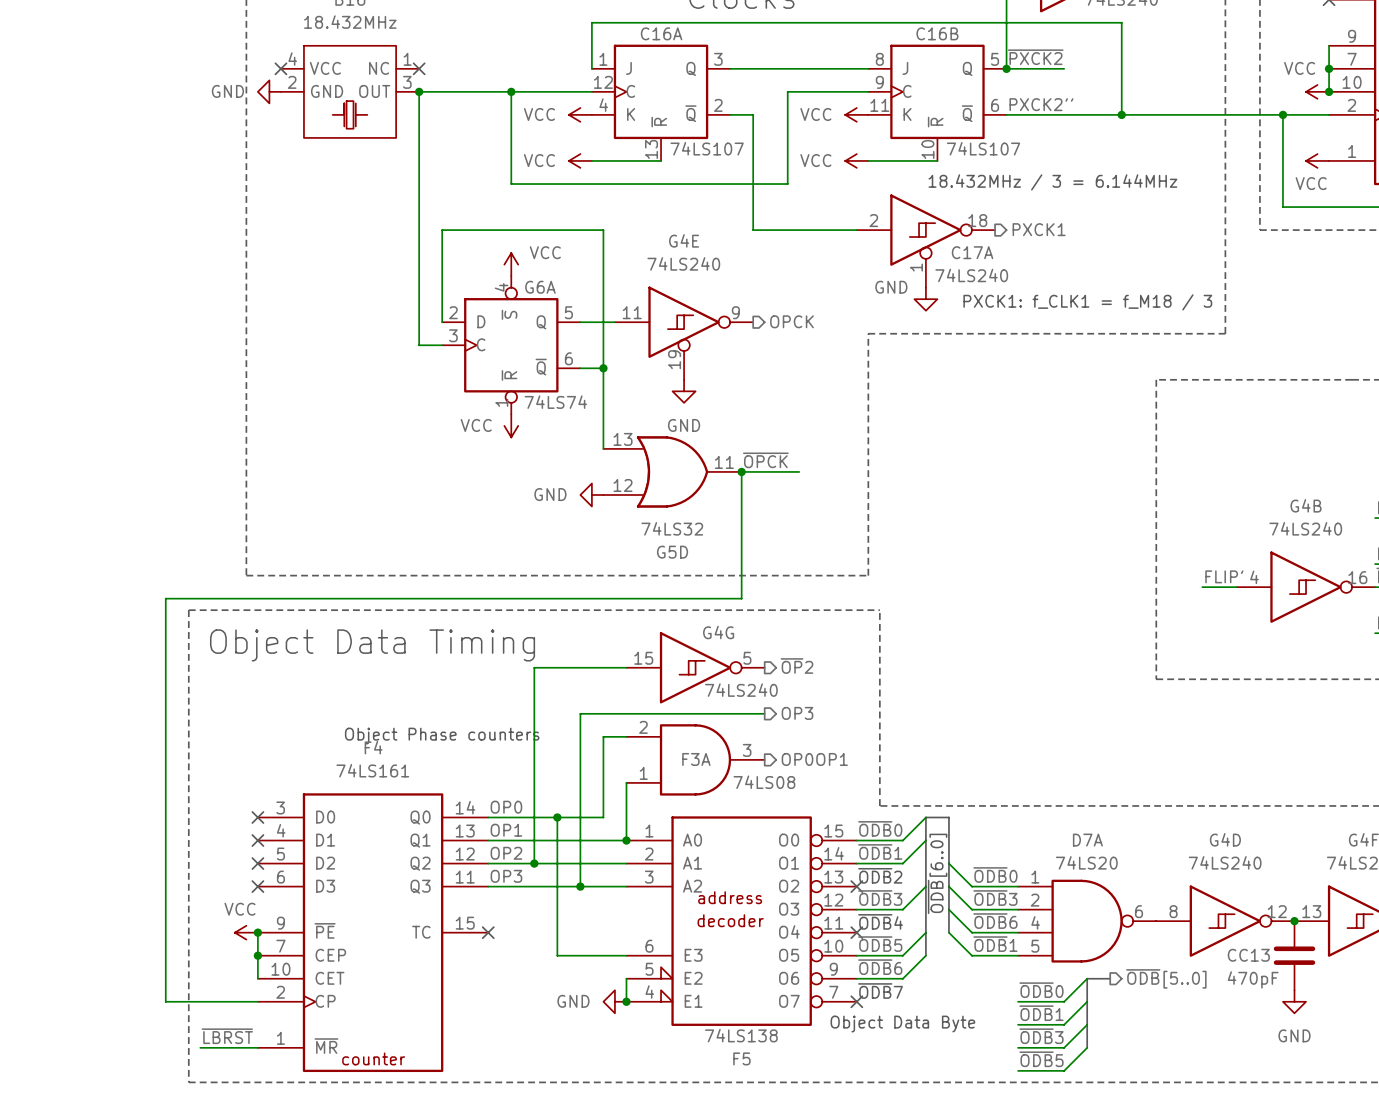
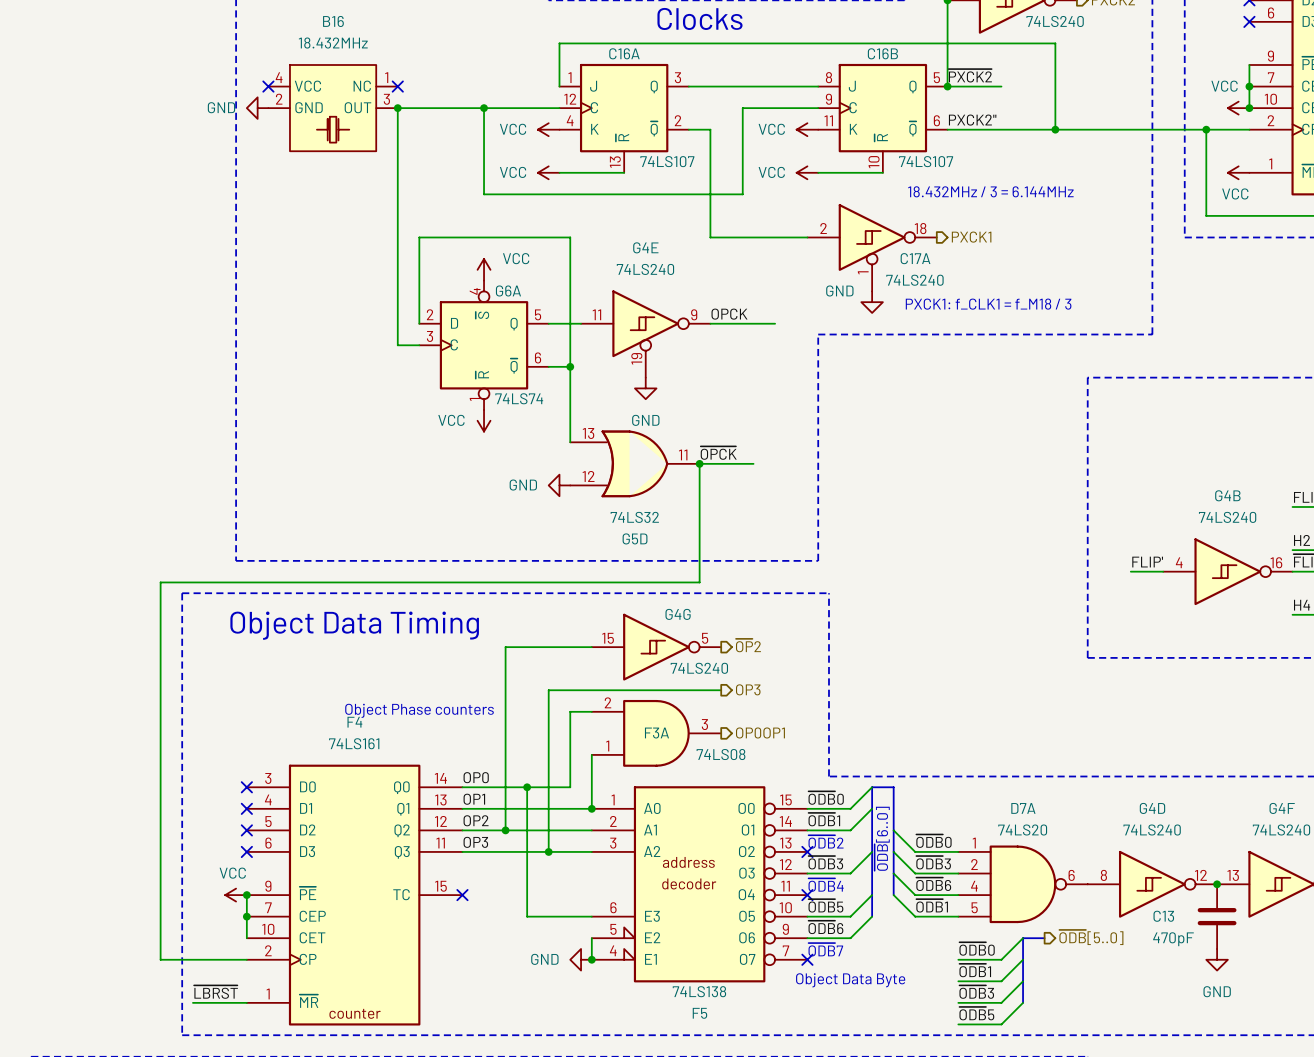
label: none -> OPCK (729, 314)
hierarchical label: OPCK (792, 321) -> none
wire: none -> (710, 323) (775, 323)
CC13 name: CC13 (1248, 955) -> C13 (1163, 916)

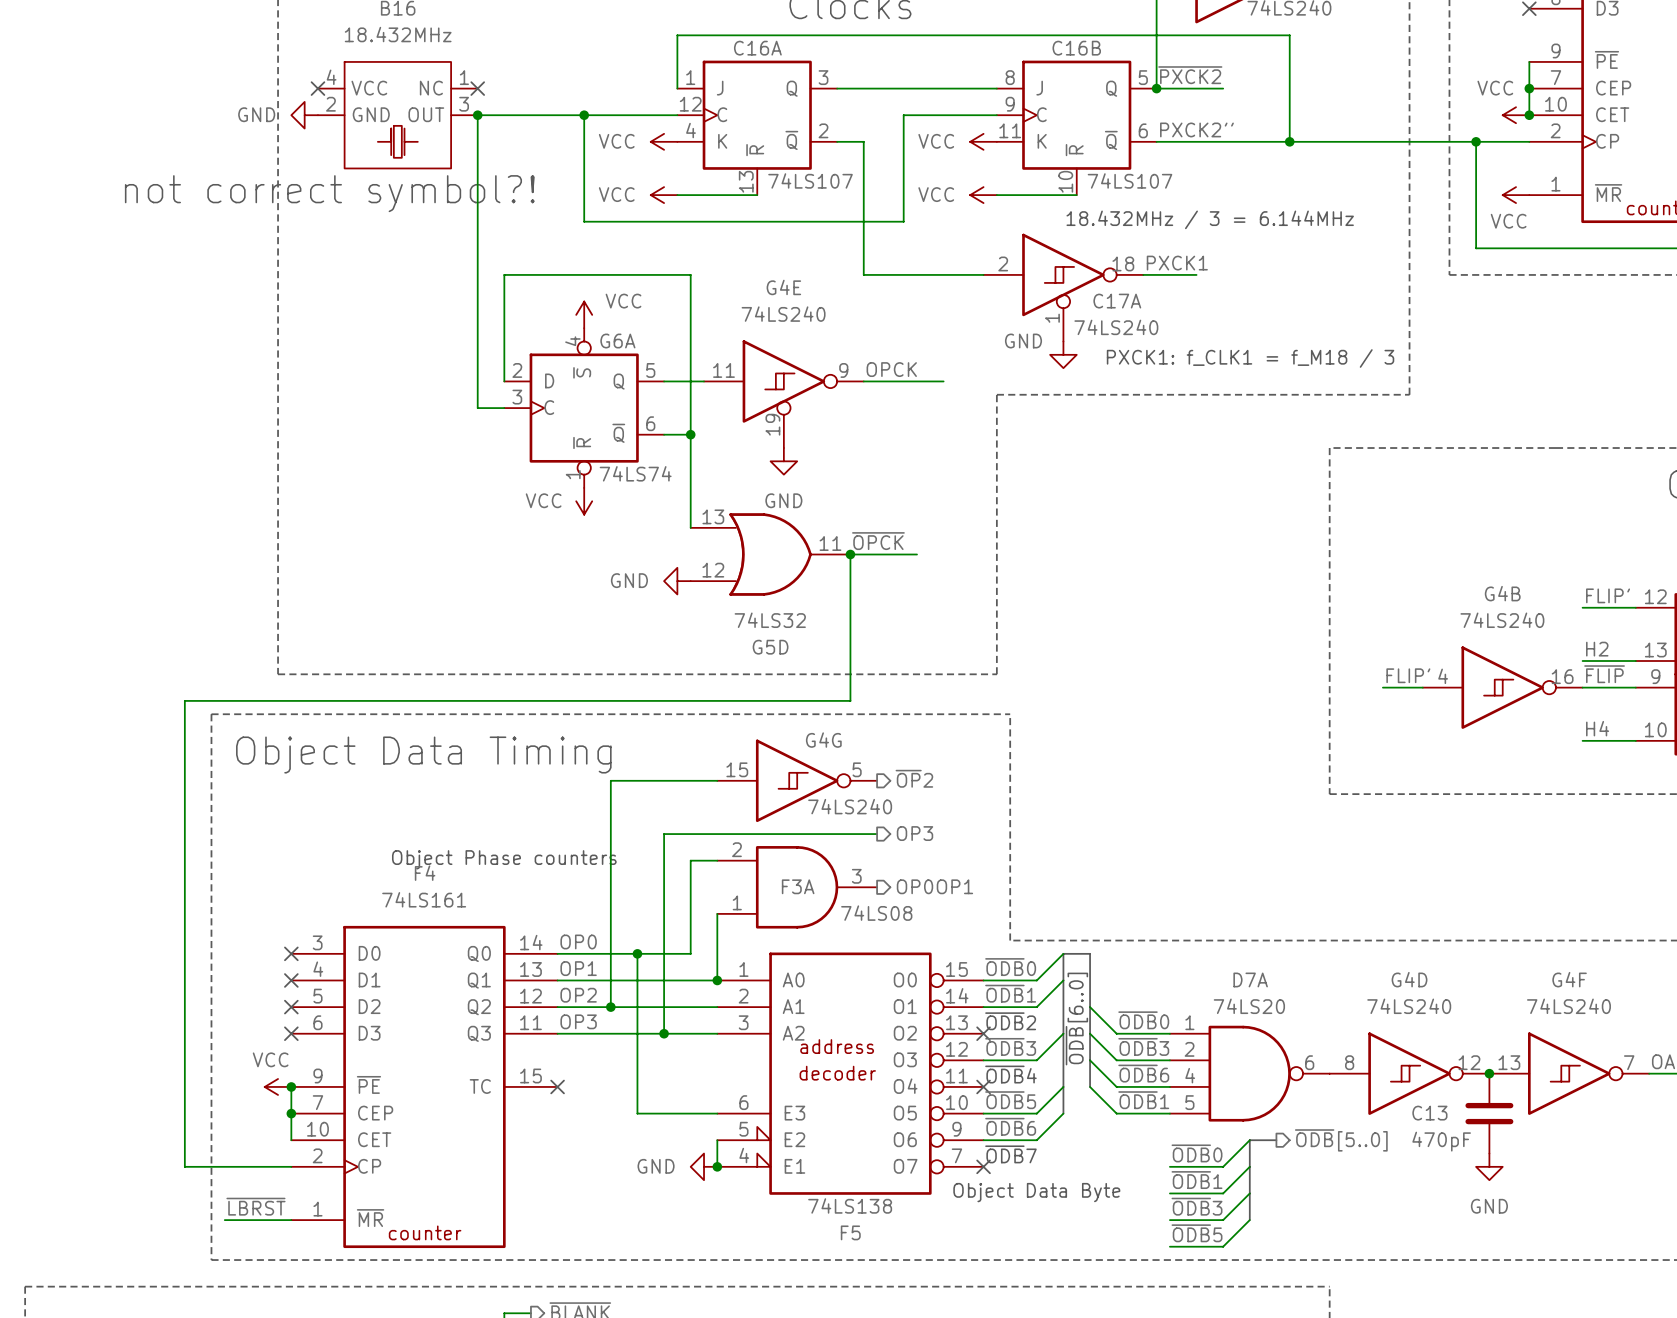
text: none -> not correct symbol?! (329, 193)
label: none -> PXCK1 (1177, 263)
wire: none -> (1143, 274) (1196, 274)
hierarchical label: PXCK1 (971, 237) -> none

